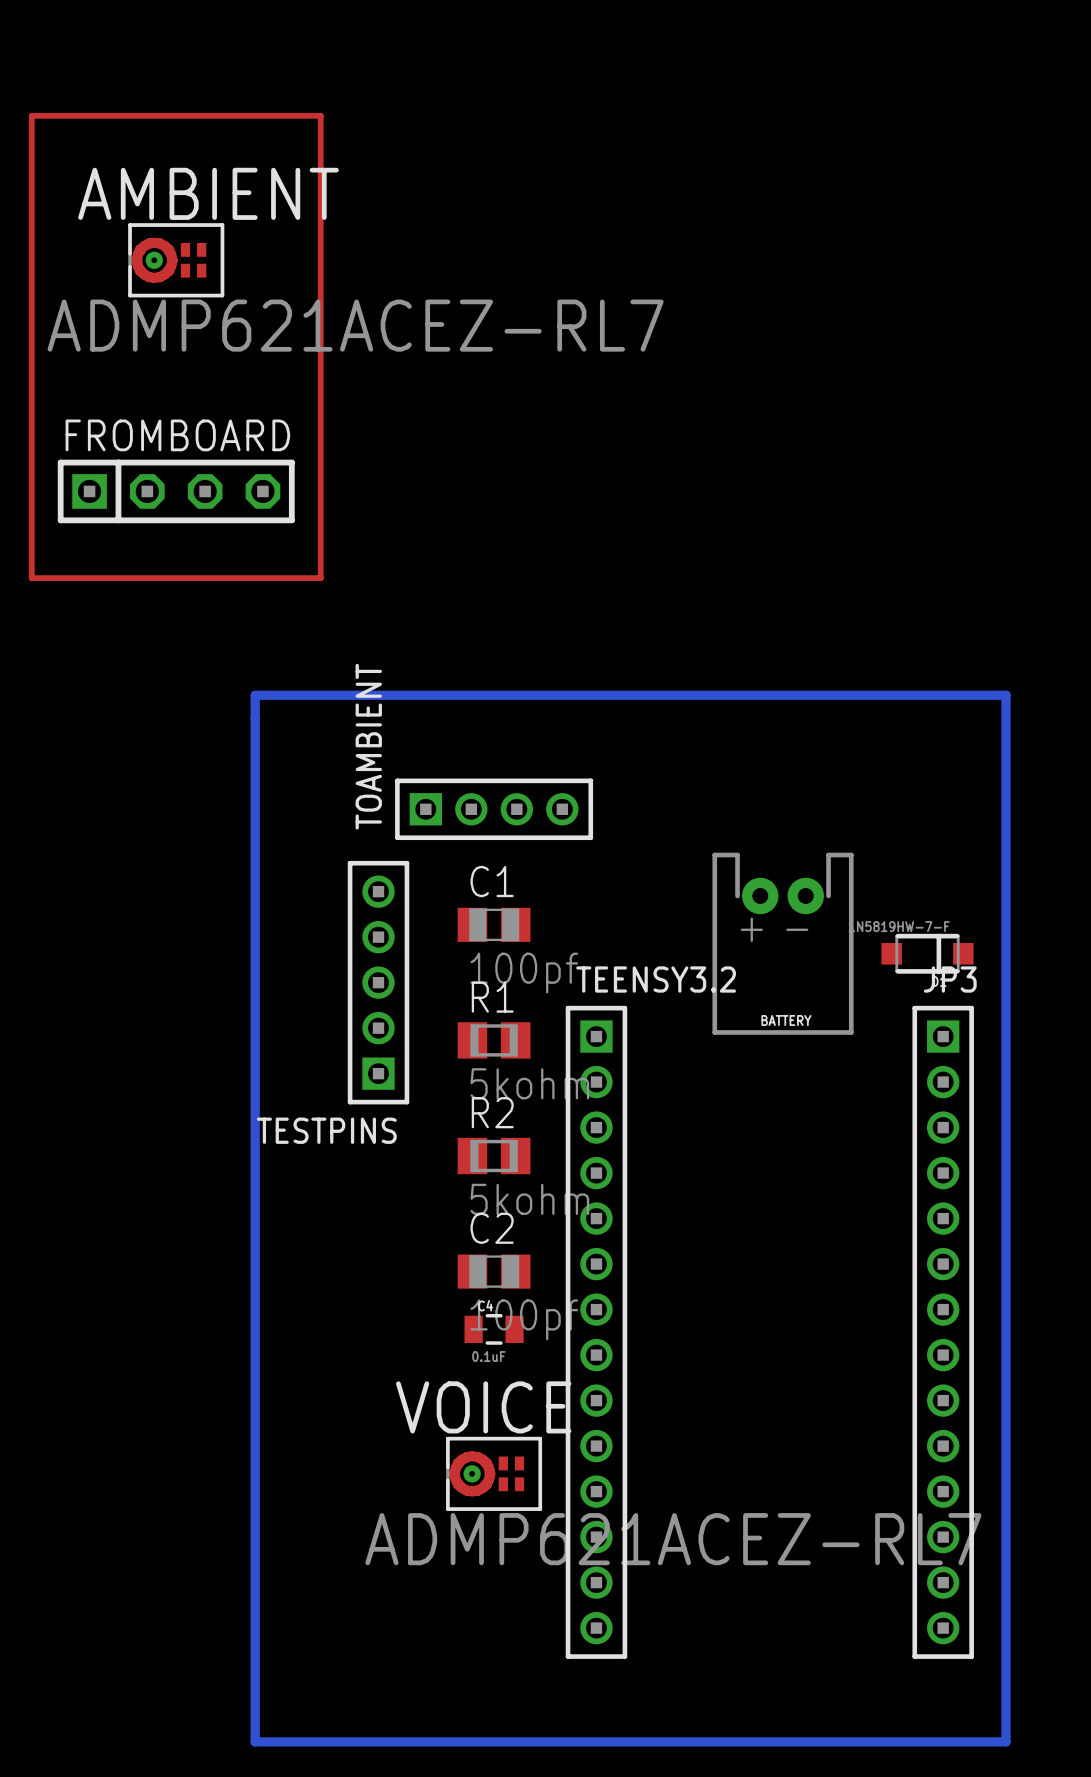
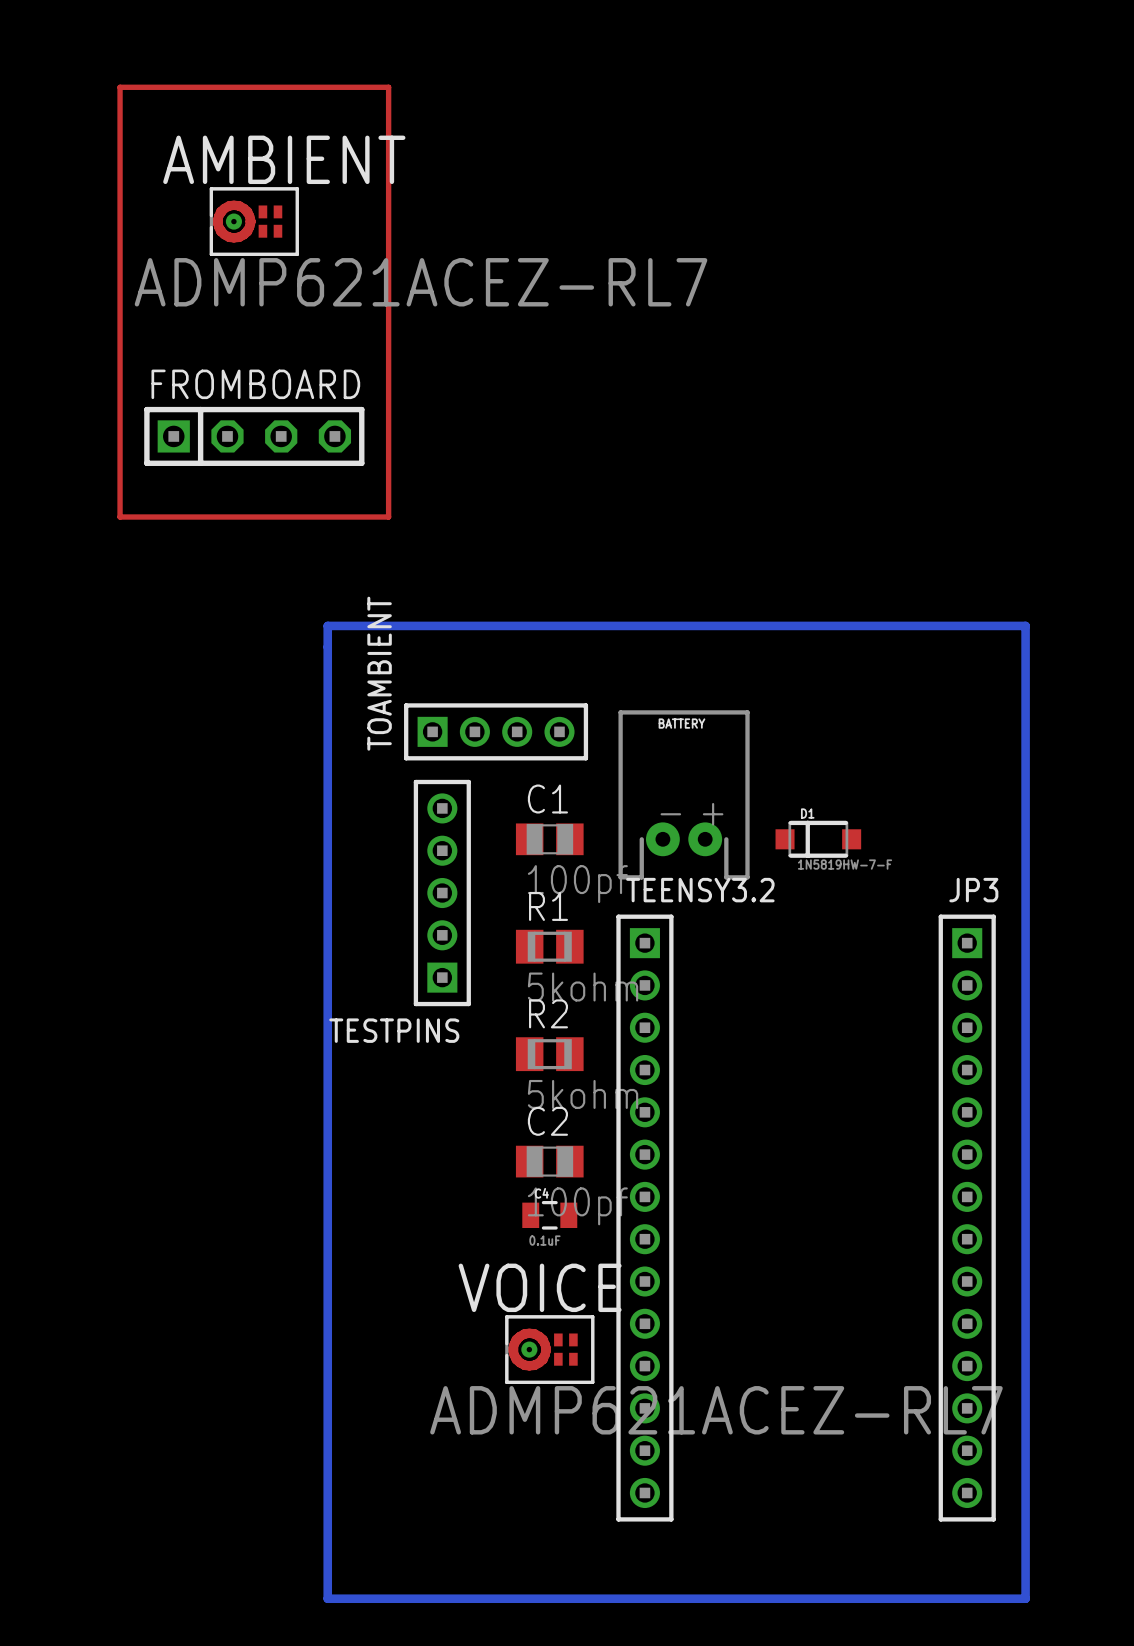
TOAMBIENT position: (494, 809) -> (496, 731)
BATTERY: none -> (684, 794)
BATTERY: (783, 943) -> none
D1 rotation: 0° (927, 953) -> 180° (818, 839)
D1 position: (927, 953) -> (818, 839)

